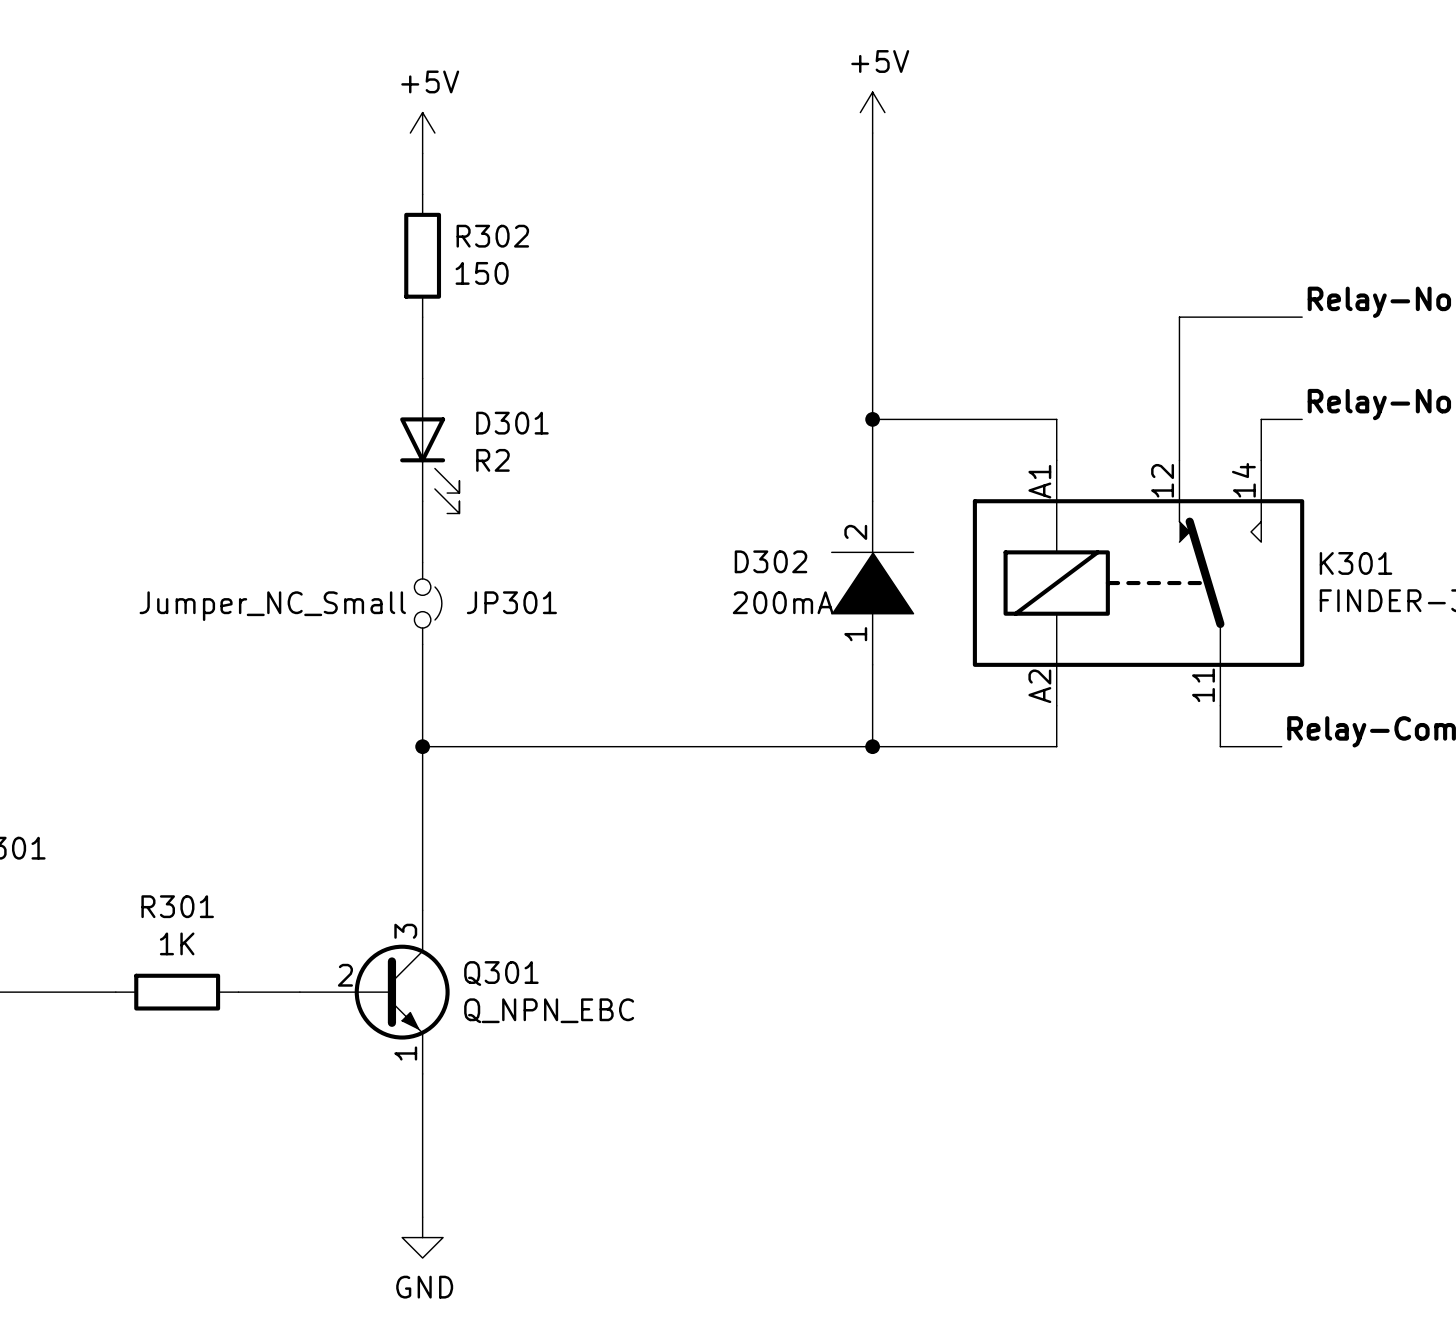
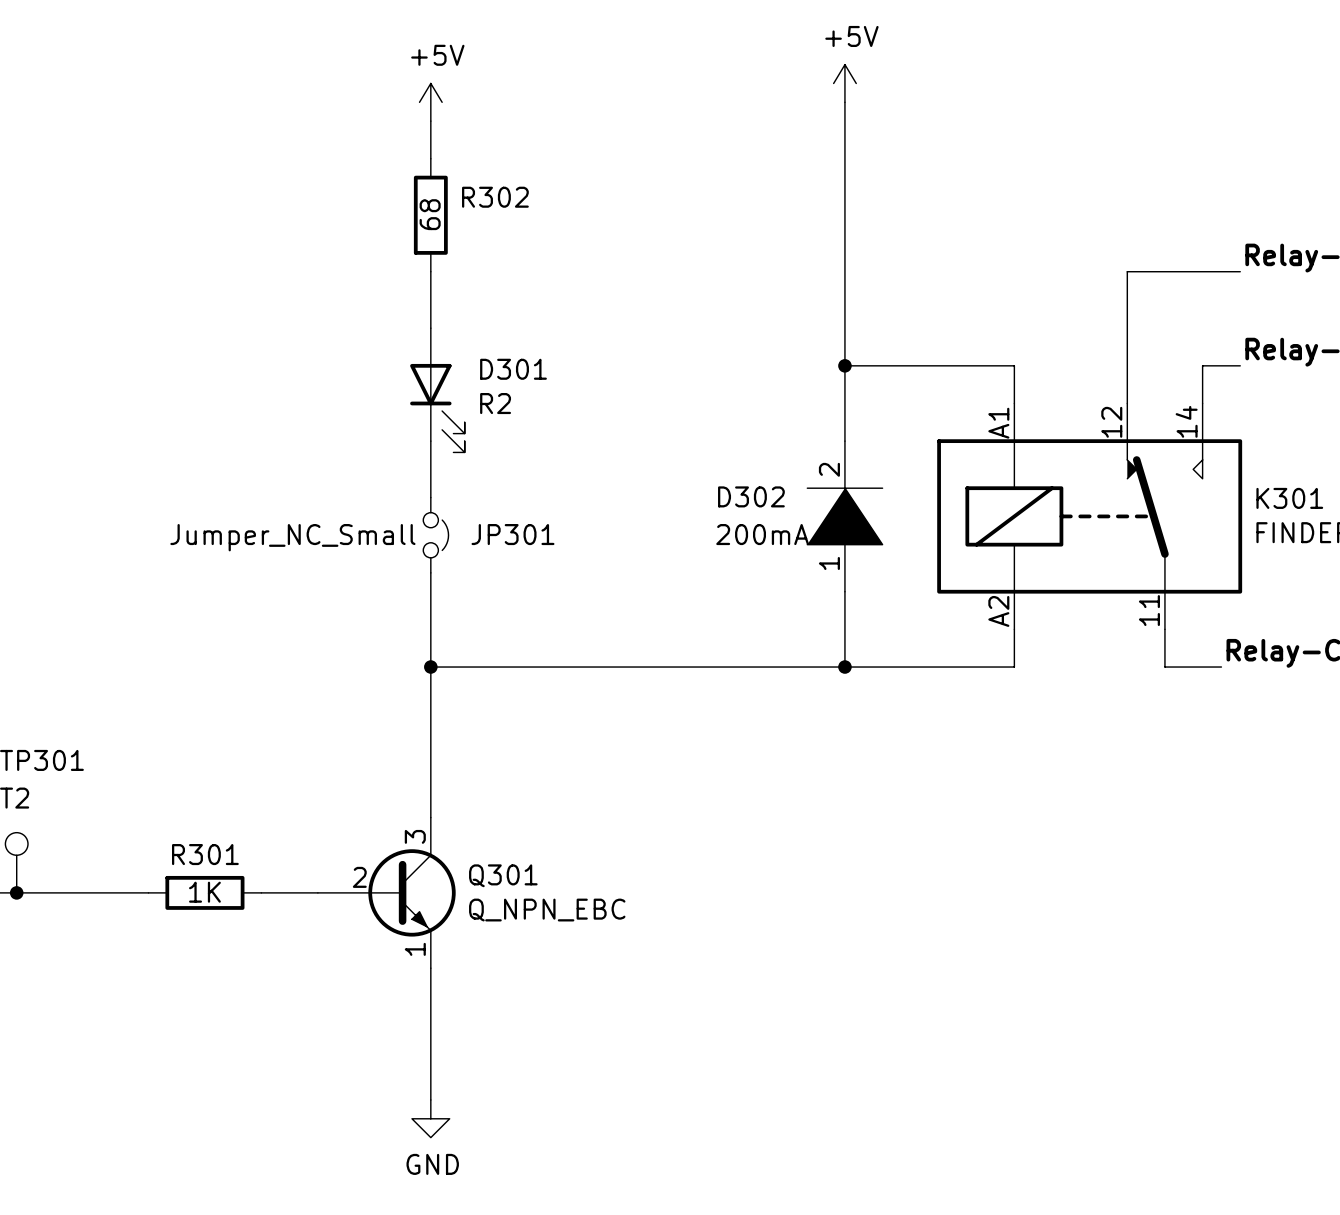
R302 value: 150 (482, 273) -> 68 (430, 214)
R301 name position: R301 (177, 906) -> R301 (205, 854)
R301 value position: 1K (177, 943) -> 1K (204, 892)

